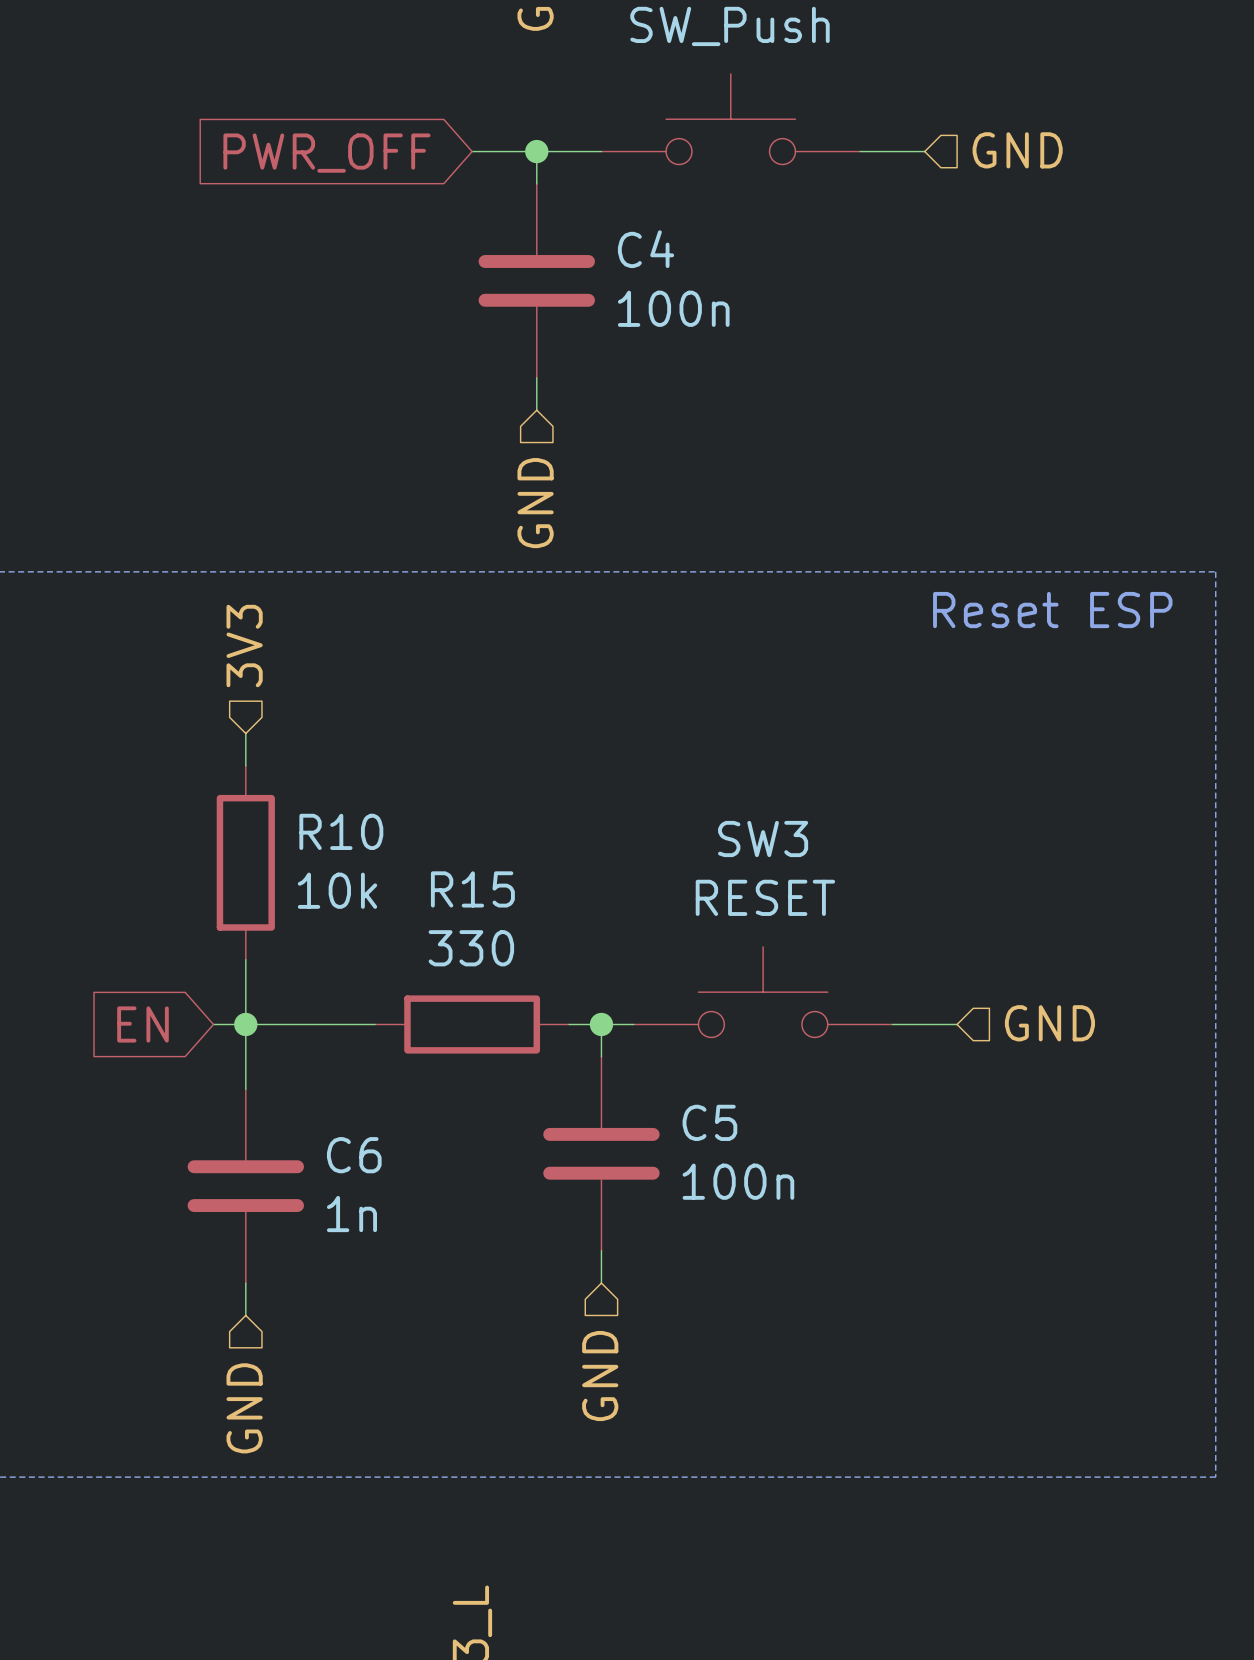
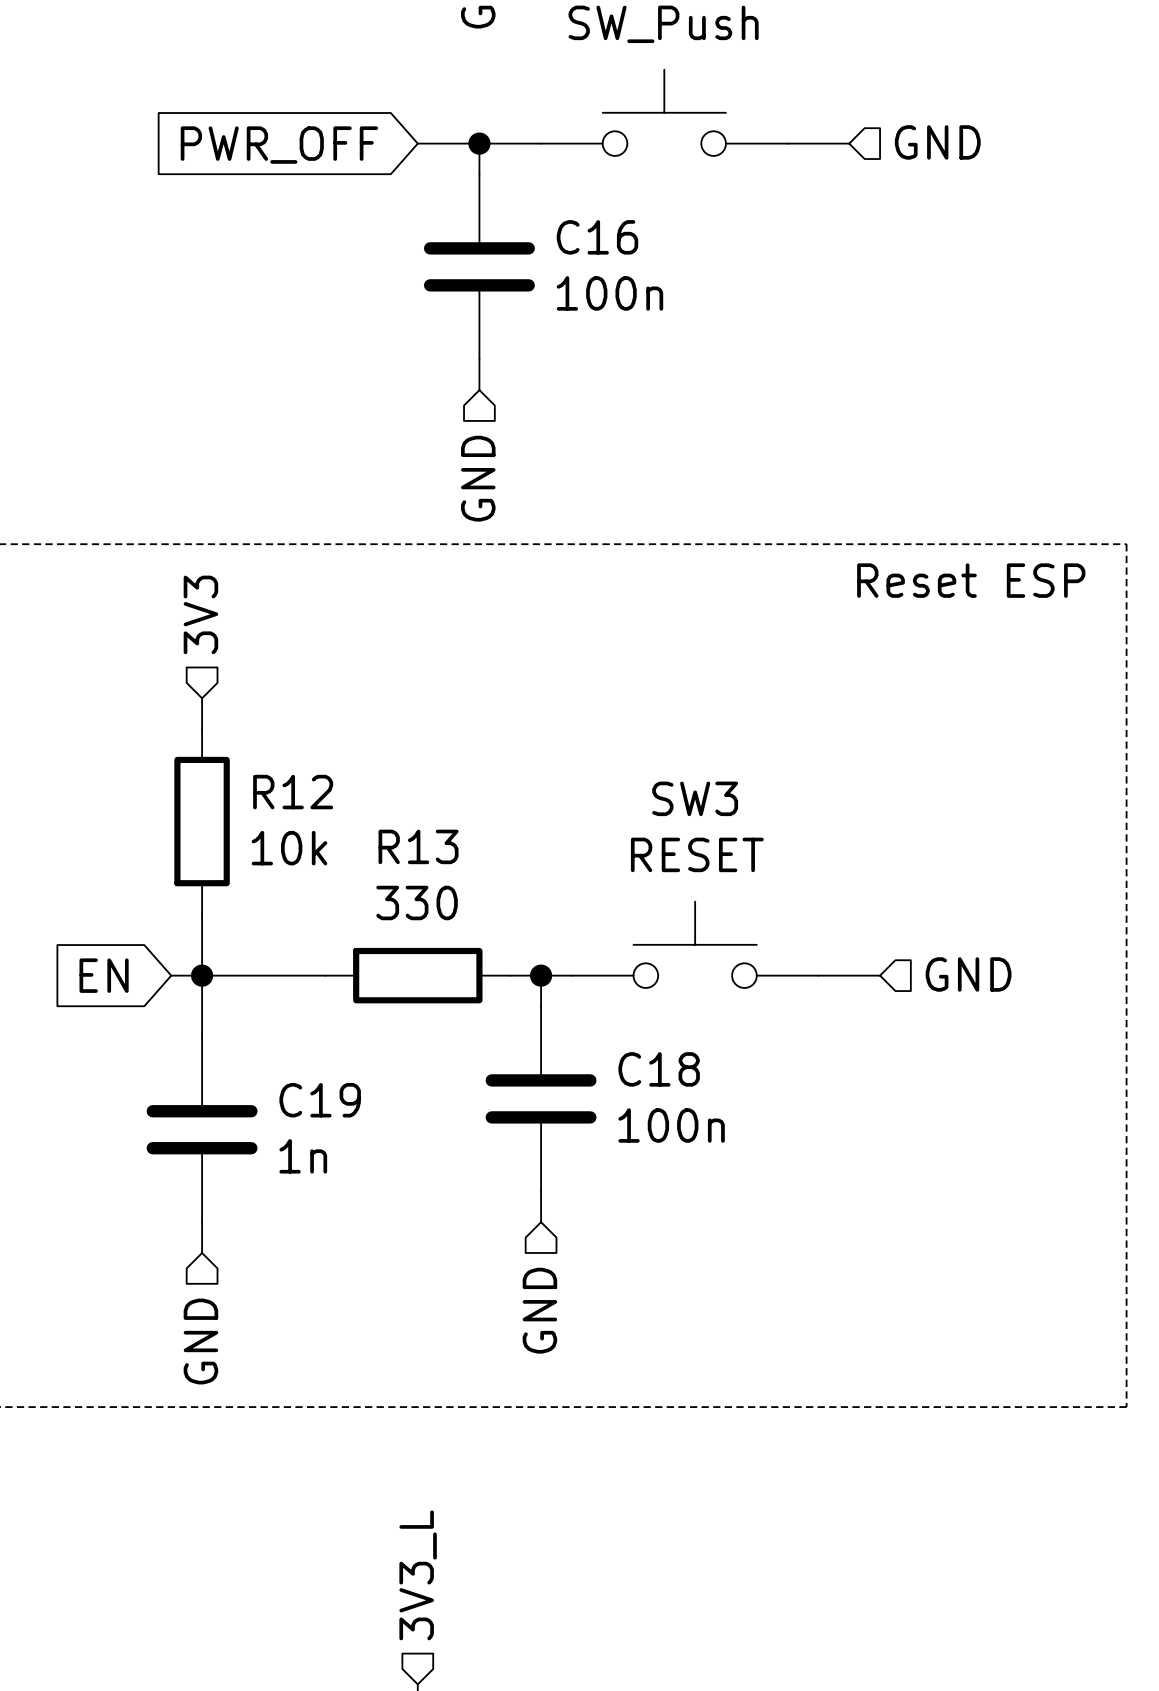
C4 name: C4 (646, 249) -> C16 (597, 237)
R10 name: R10 (341, 831) -> R12 (293, 792)
R15 name: R15 (472, 889) -> R13 (418, 846)
C5 name: C5 (709, 1122) -> C18 (659, 1069)
C6 name: C6 (354, 1155) -> C19 (320, 1100)

